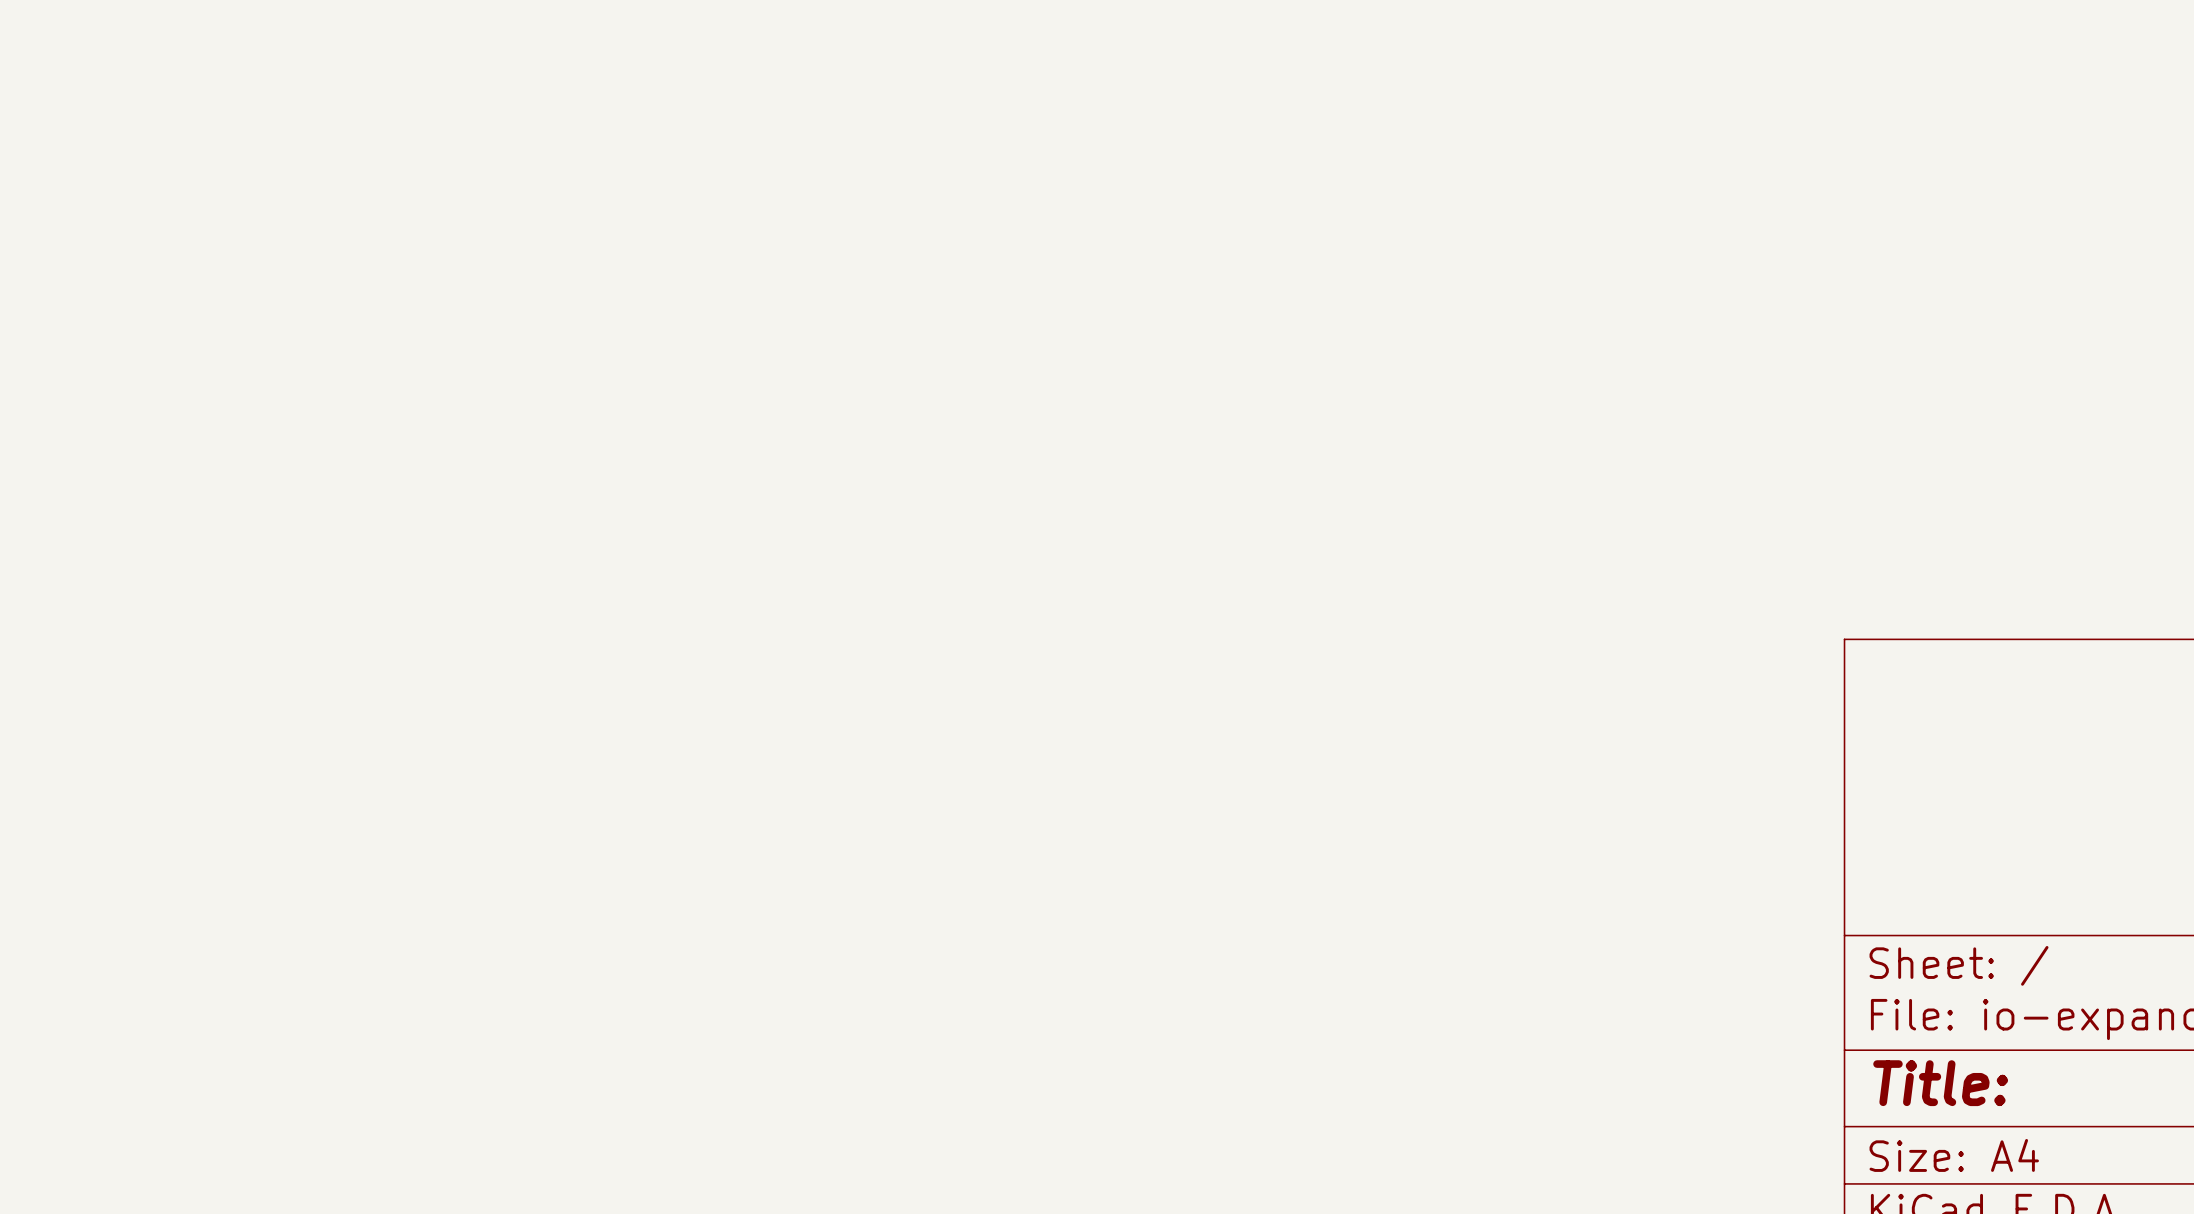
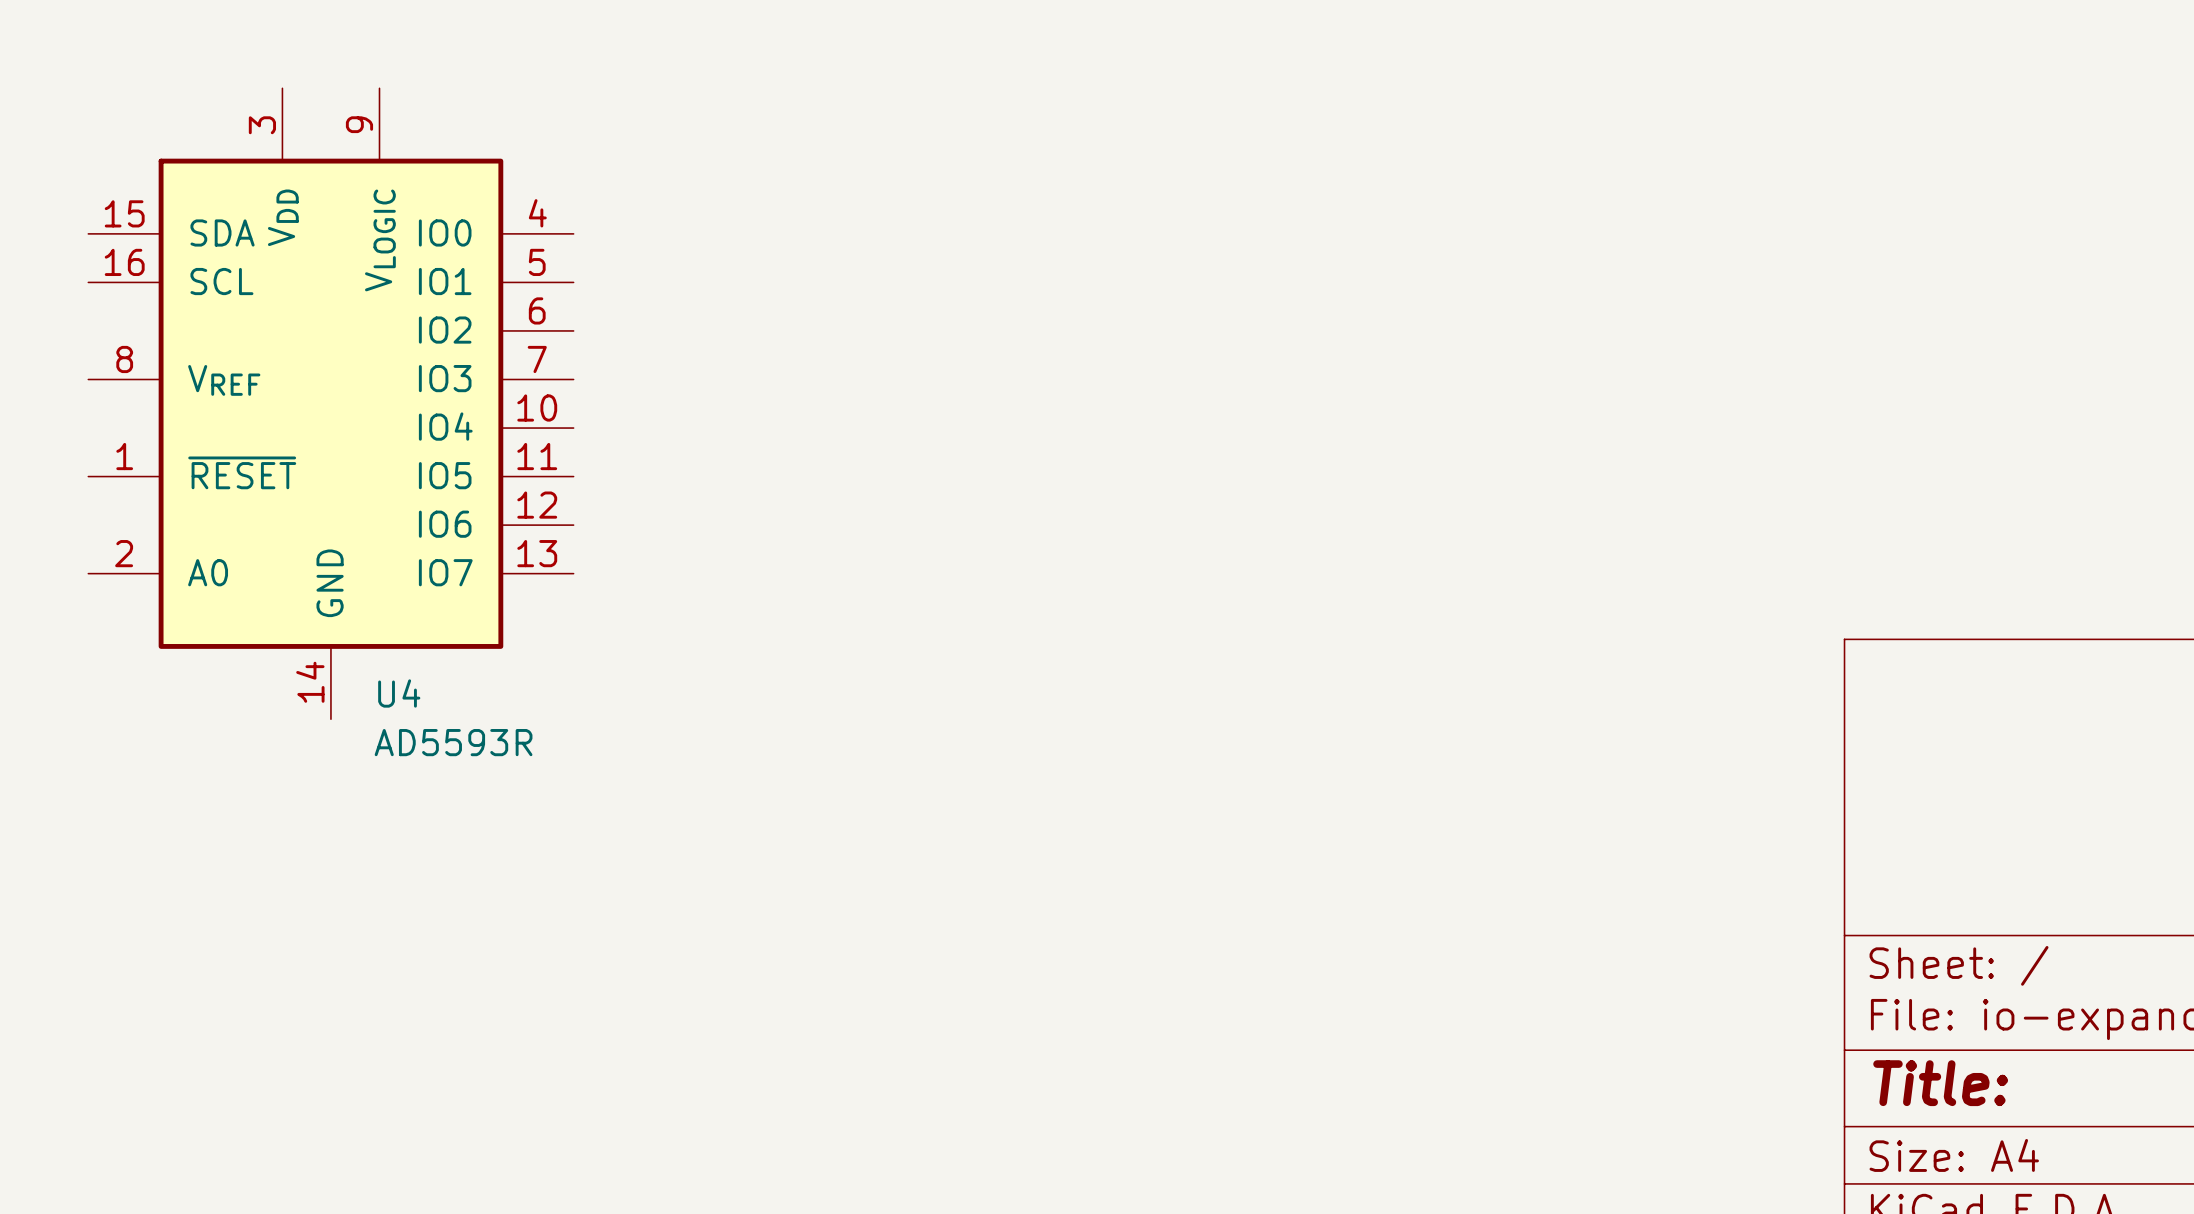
U4: none -> AD5593R (330, 403)

